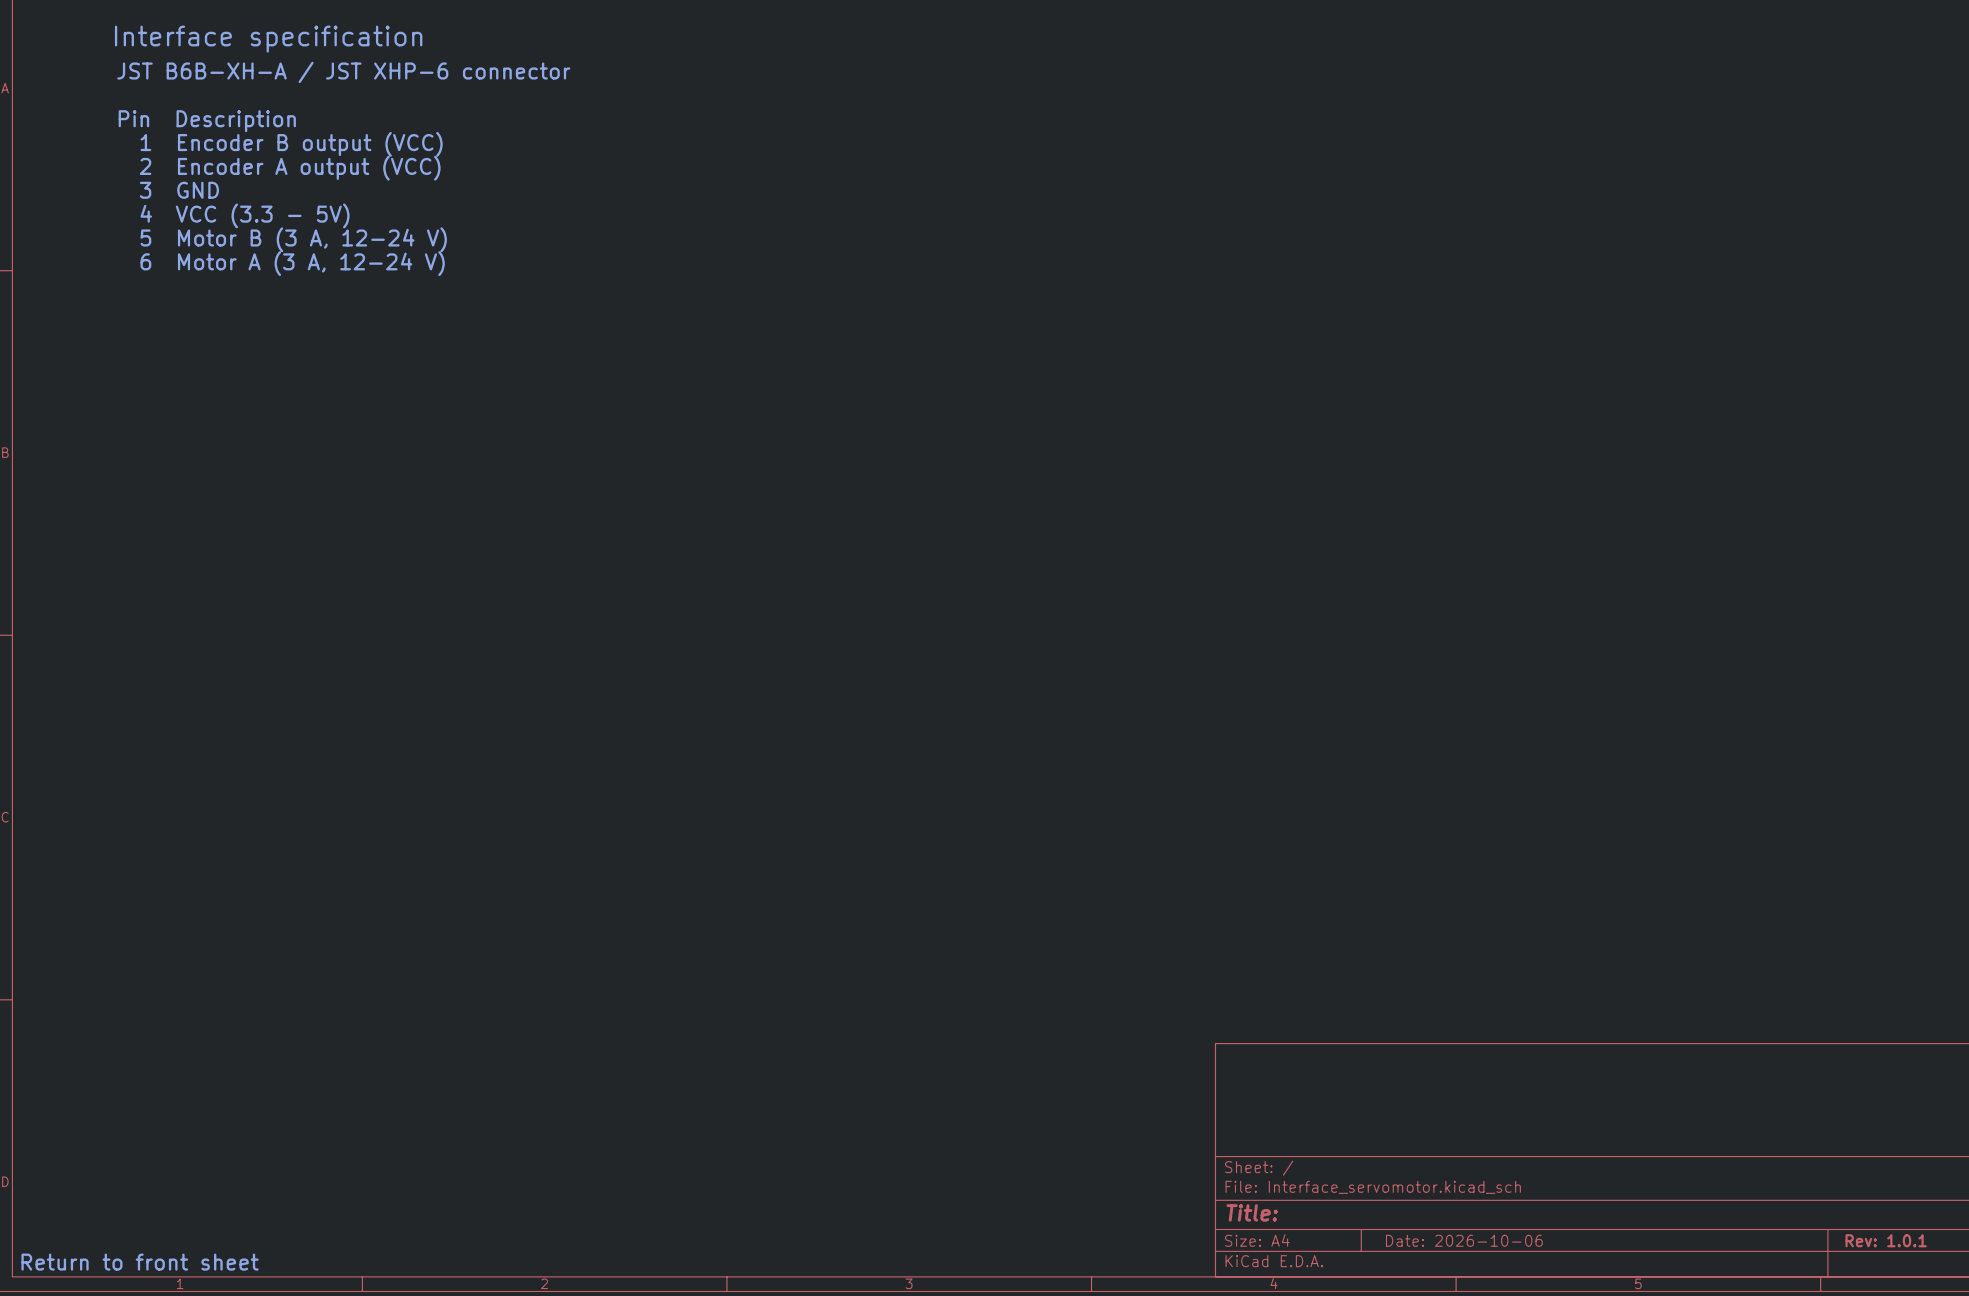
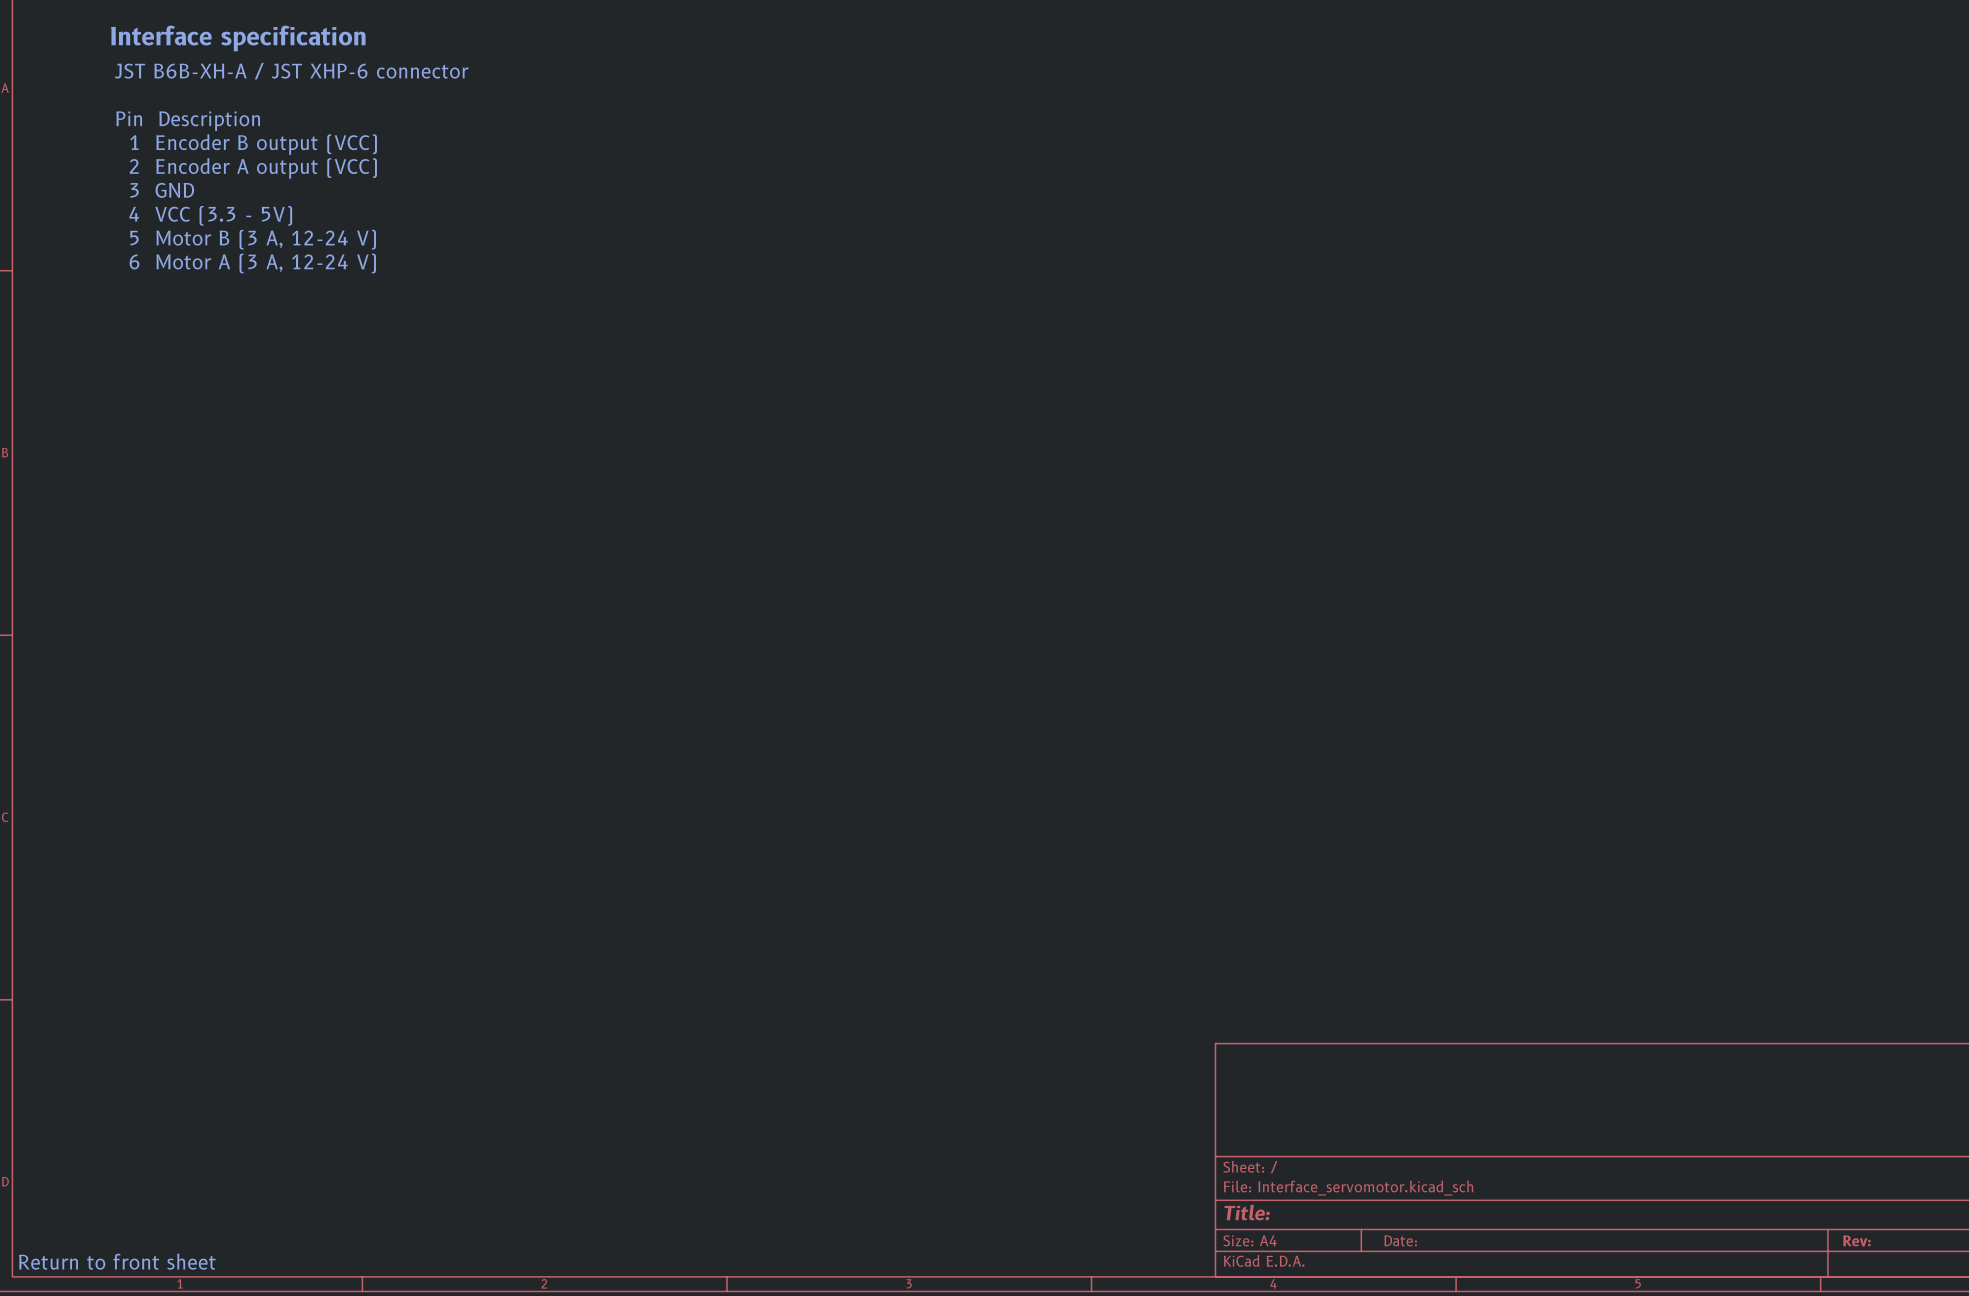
title block: Date: 2026-10-06 (1464, 1240) -> Date: (1400, 1240)
title block: Rev: 1.0.1 (1886, 1240) -> Rev: (1856, 1240)

